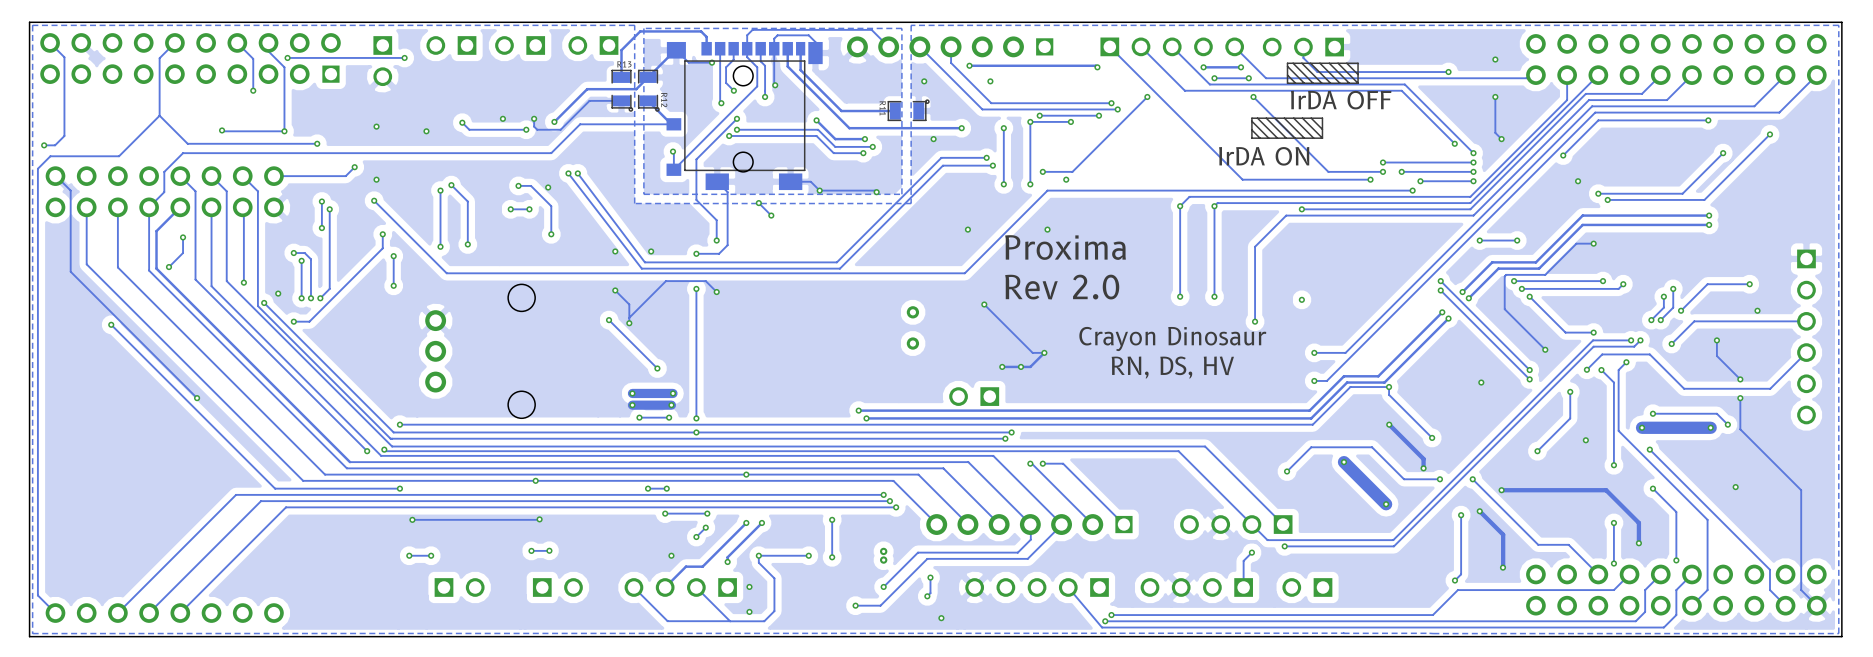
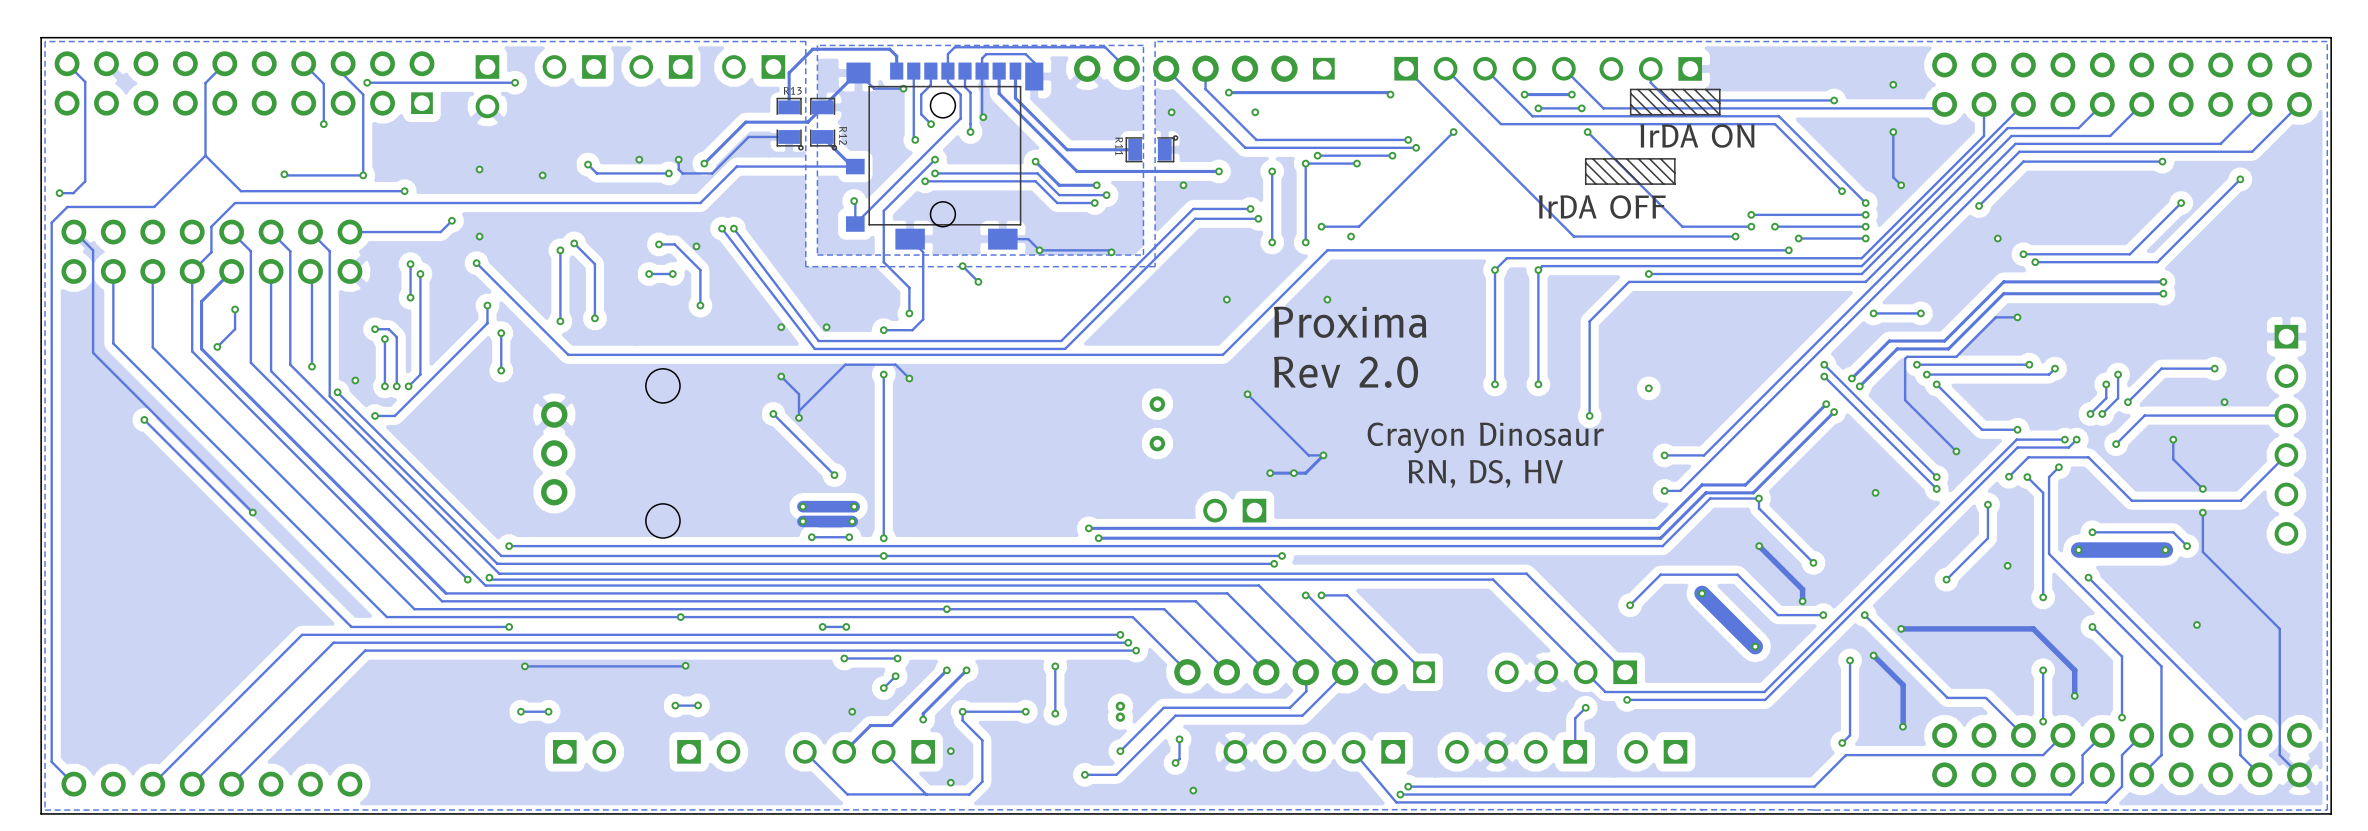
text: IrDA OFF (1341, 100) -> IrDA ON (1697, 136)
text: IrDA ON (1264, 156) -> IrDA OFF (1602, 207)

